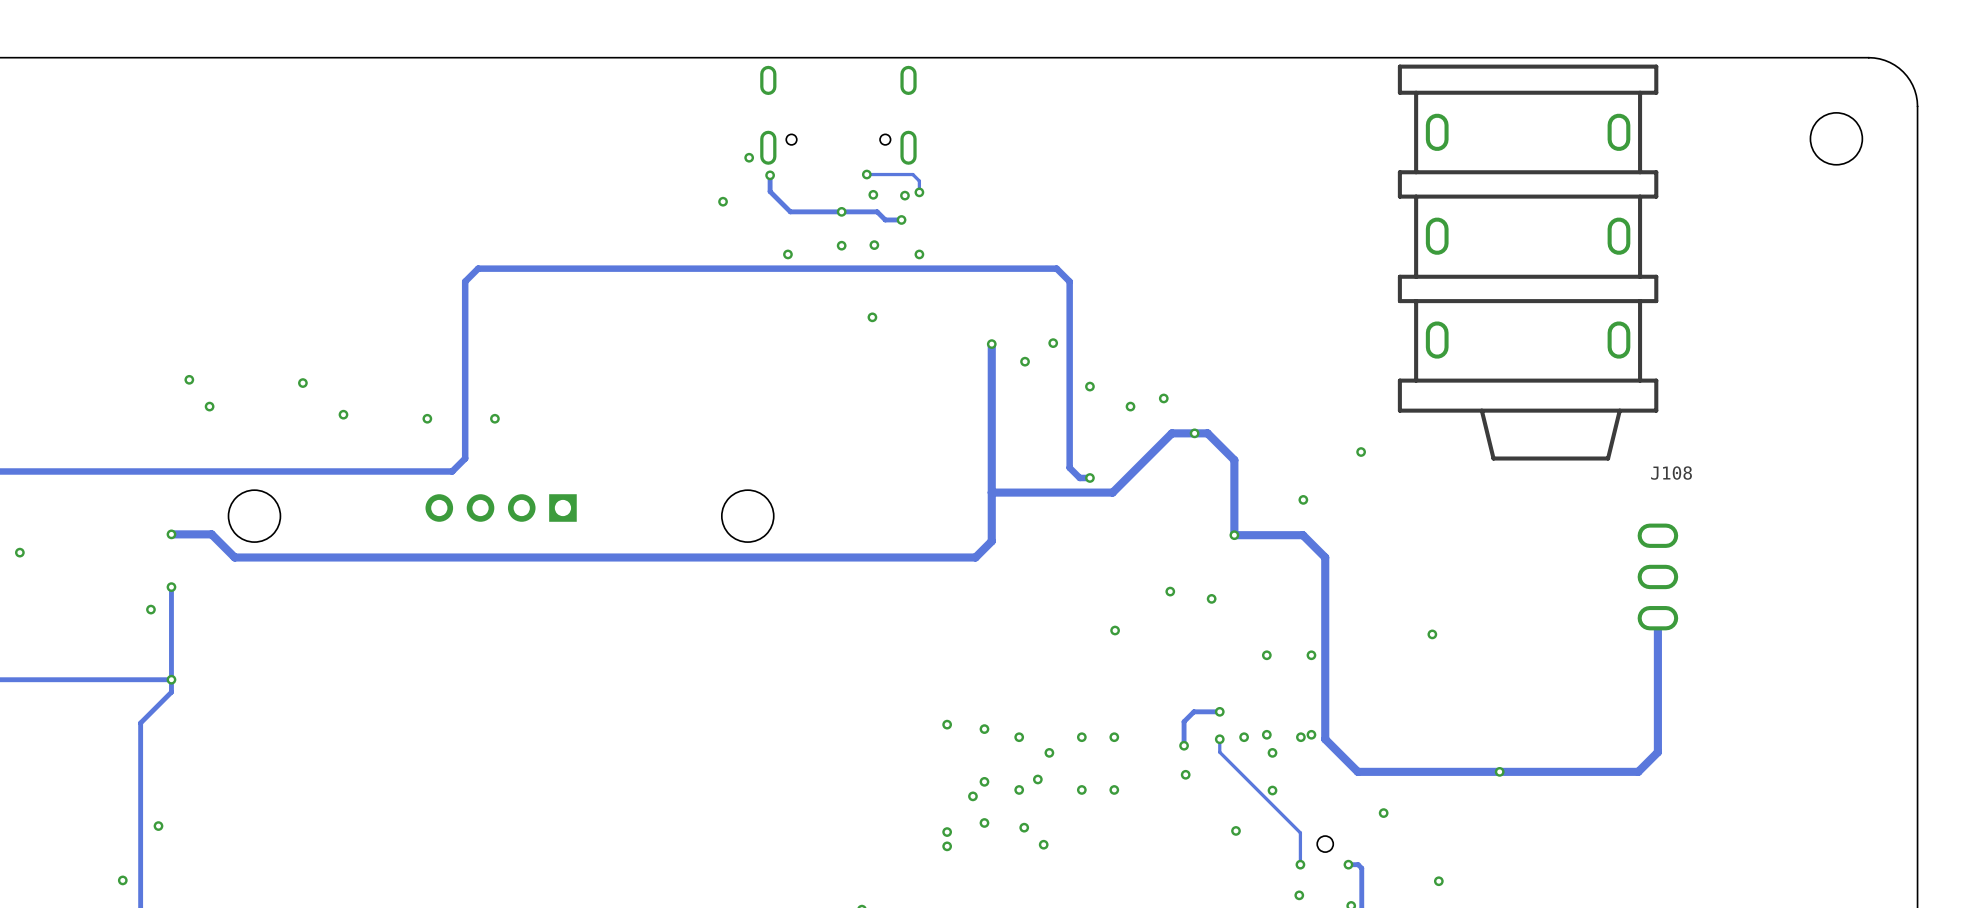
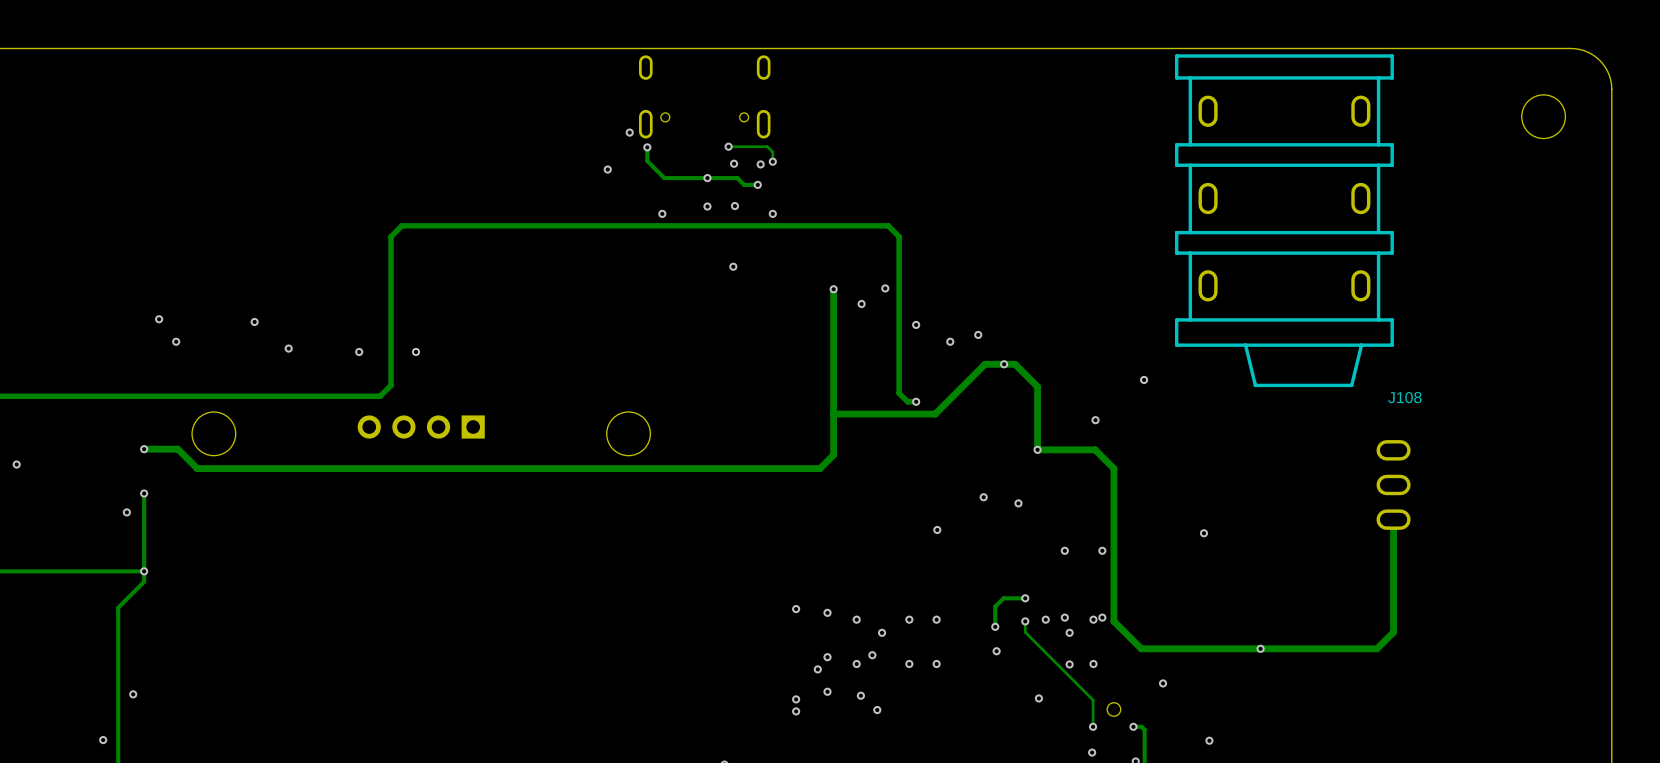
via: none -> (1093, 664)

